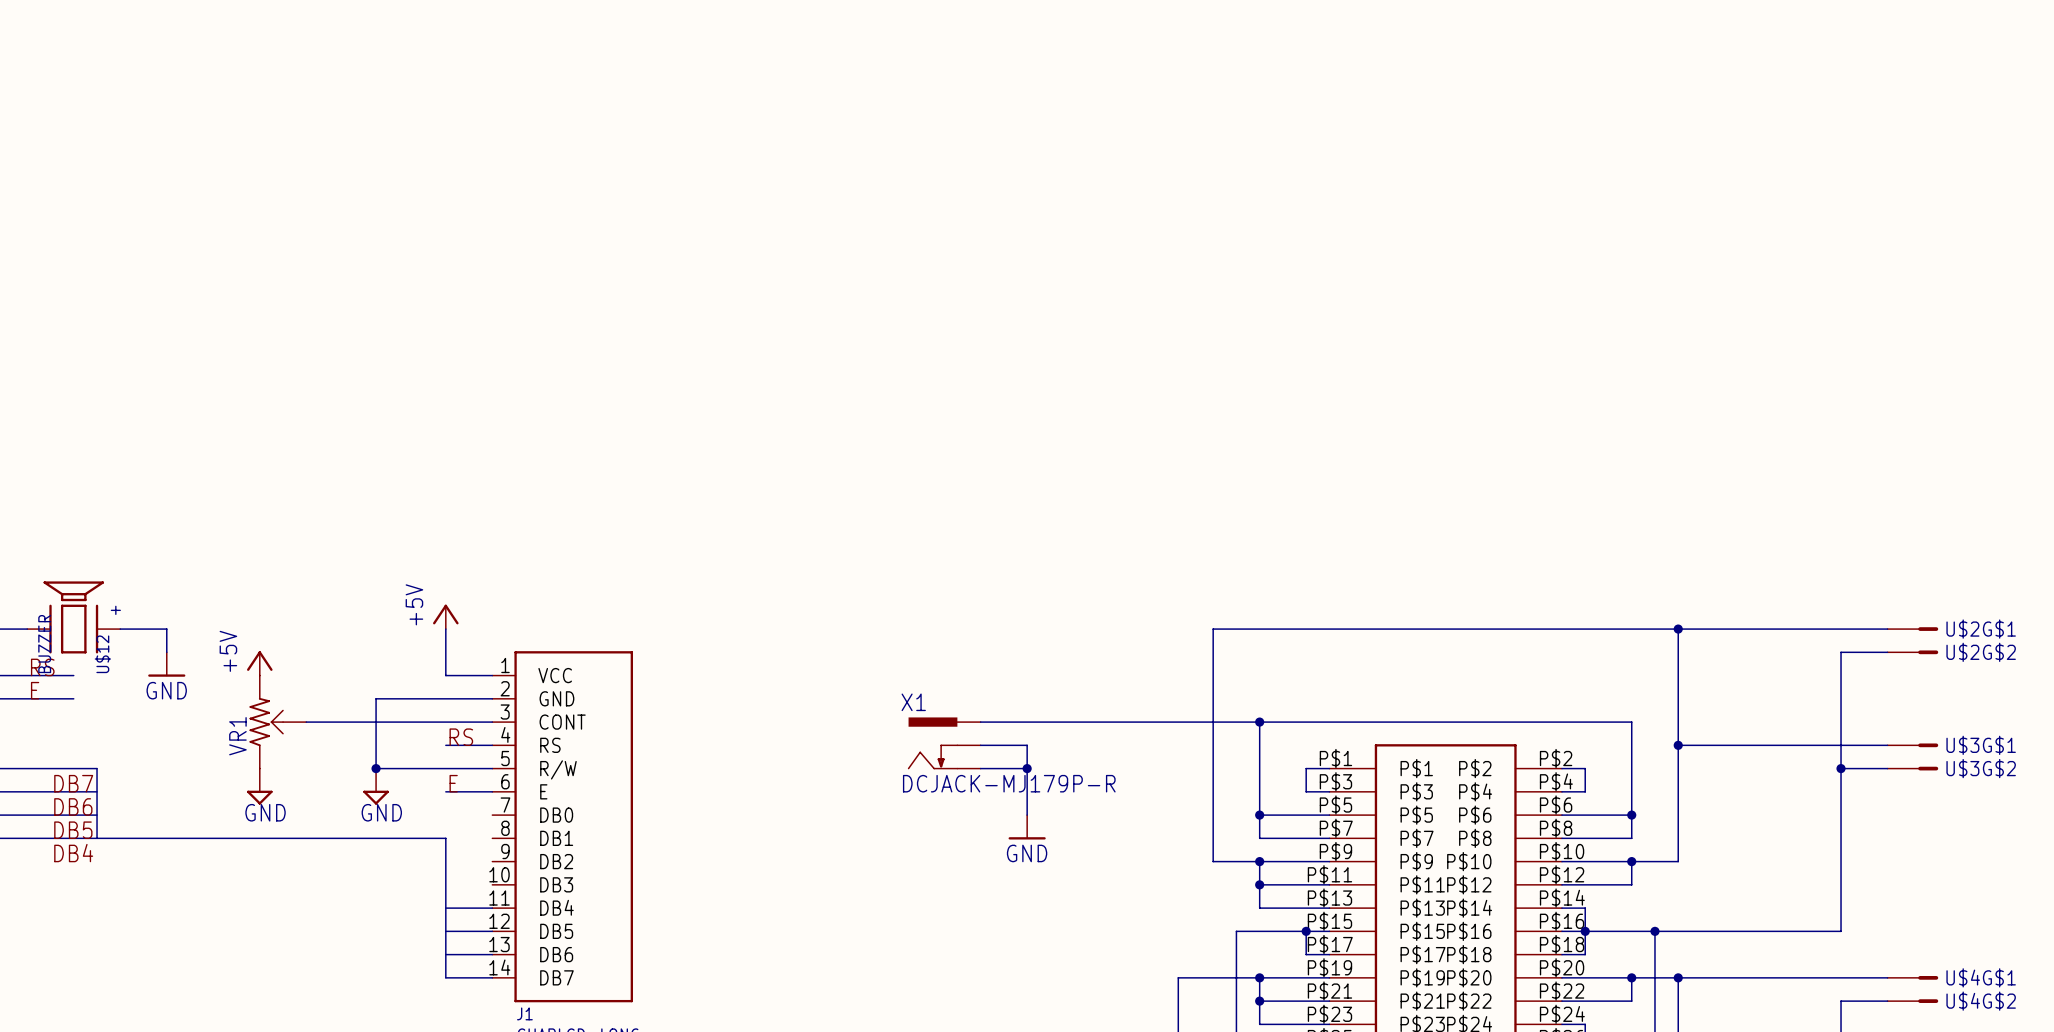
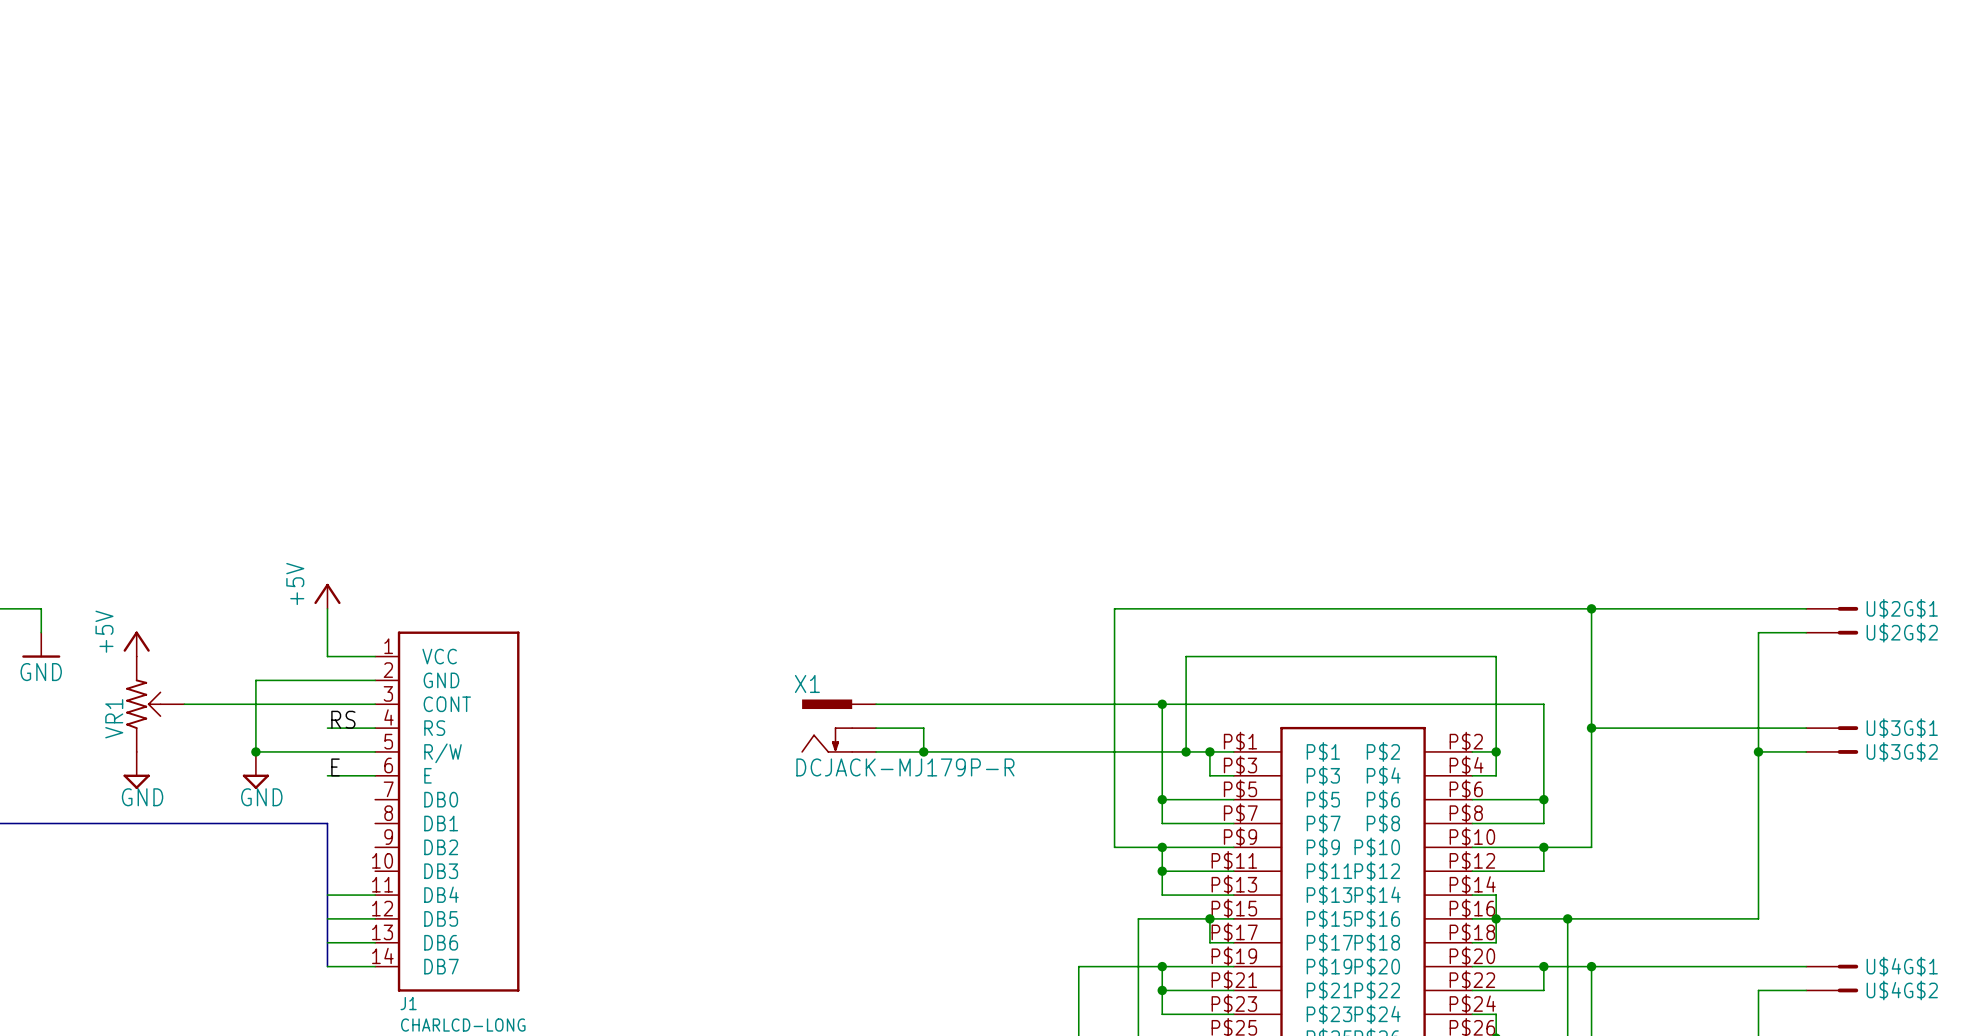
wire: (1027, 768) (1027, 815) -> (923, 751) (1209, 751)
wire: none -> (1186, 751) (1186, 656) (1496, 656) (1496, 751)
junction: none -> (1186, 751)
junction: none -> (1209, 751)
junction: none -> (1496, 751)
power symbol: GND (1027, 827) -> none

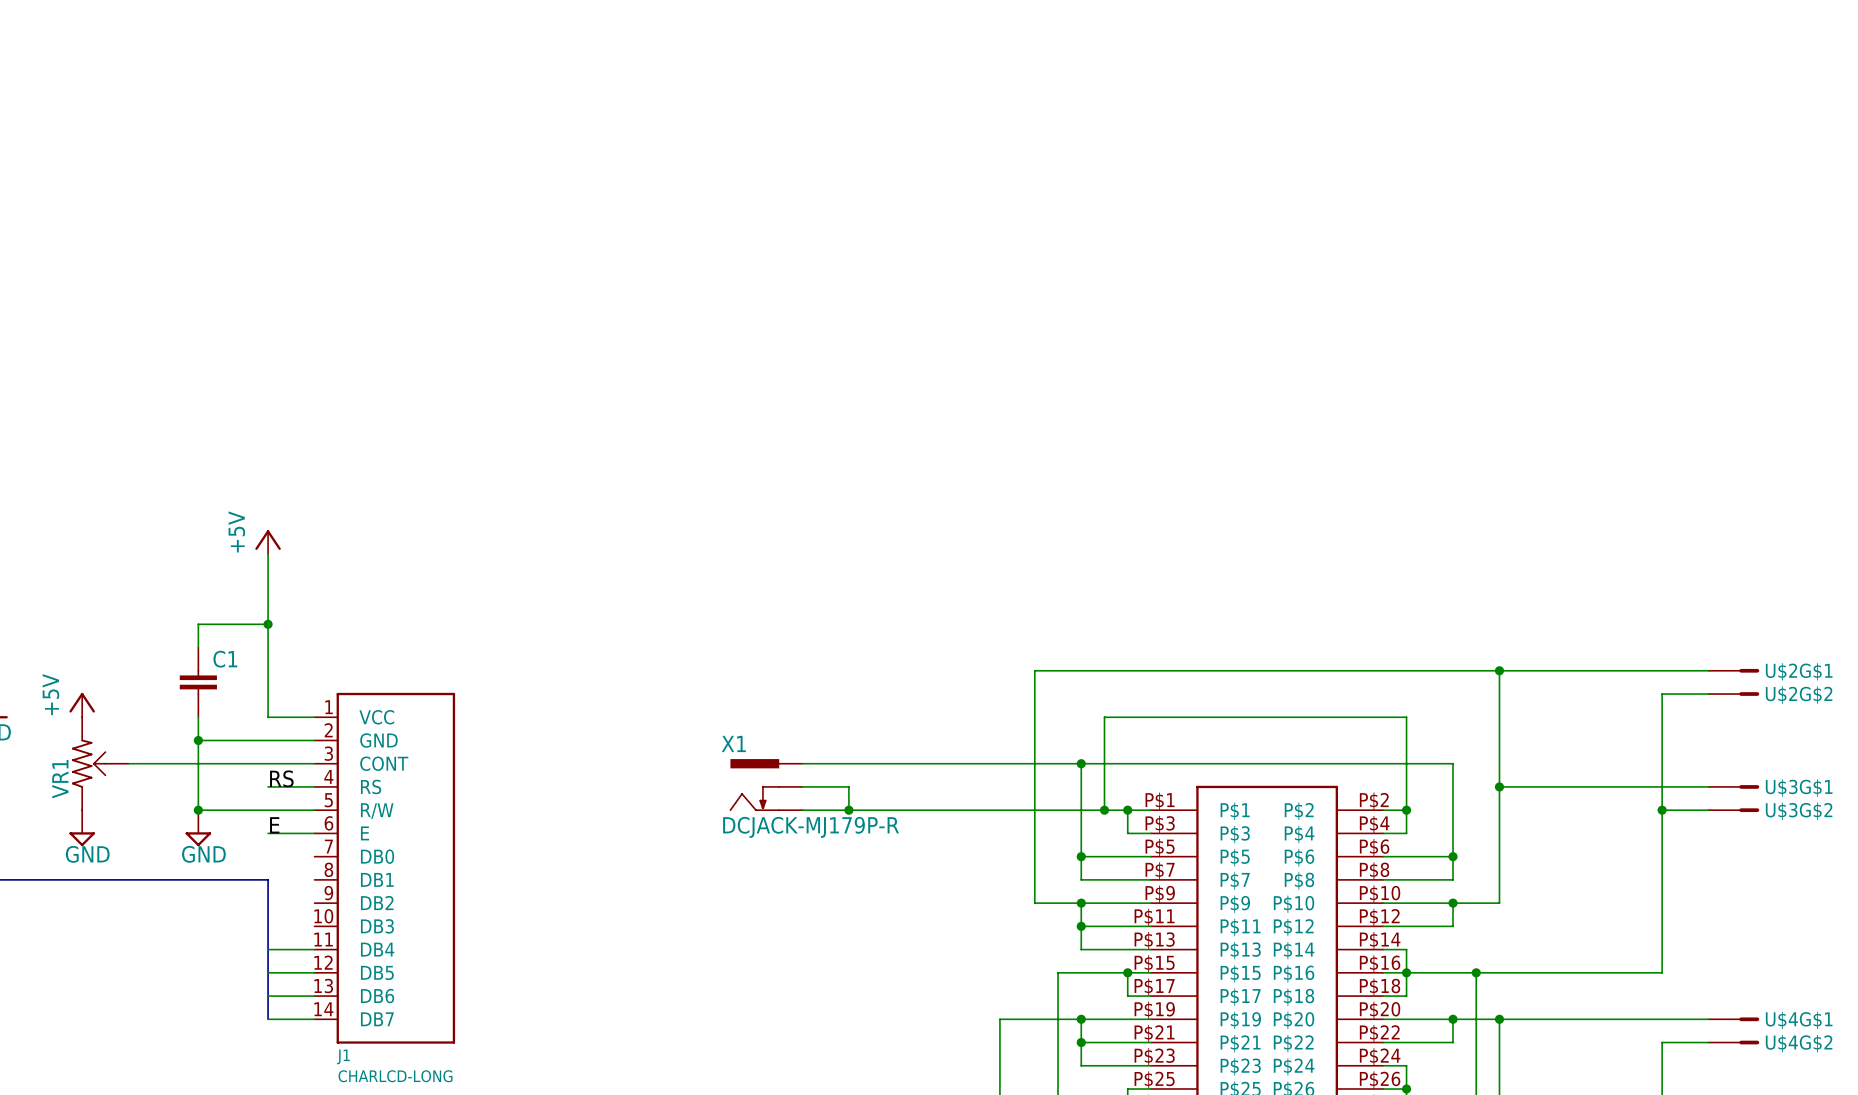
wire: none -> (268, 554) (268, 670)
wire: none -> (268, 624) (198, 624) (198, 647)
junction: none -> (268, 624)
power symbol position: +5V (327, 596) -> +5V (268, 542)
C1: none -> (198, 682)
wire: none -> (198, 717) (198, 740)
junction: none -> (198, 740)

